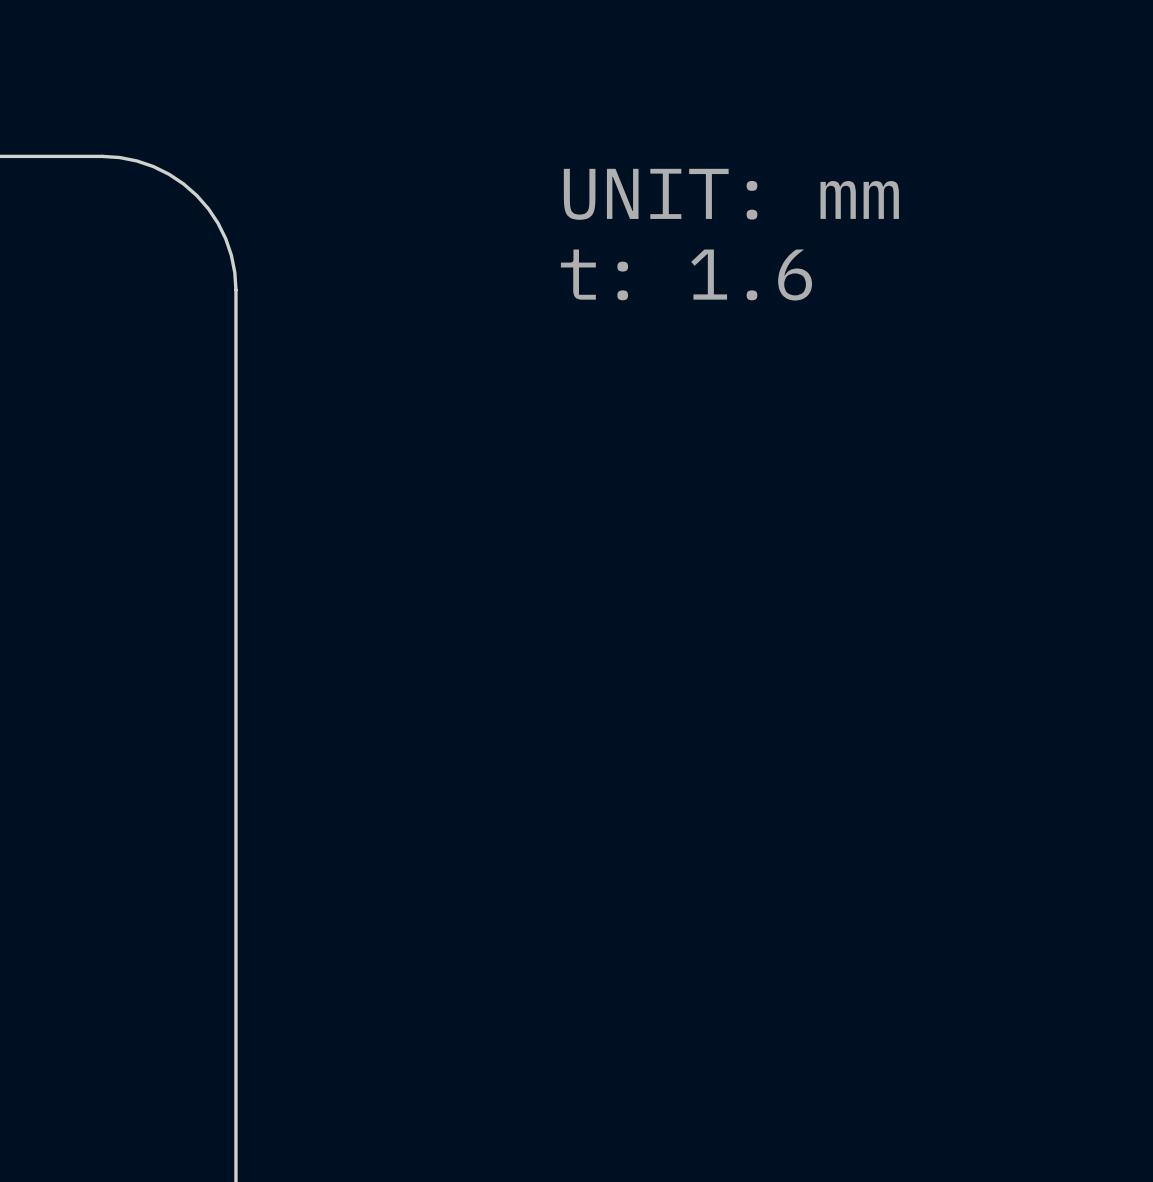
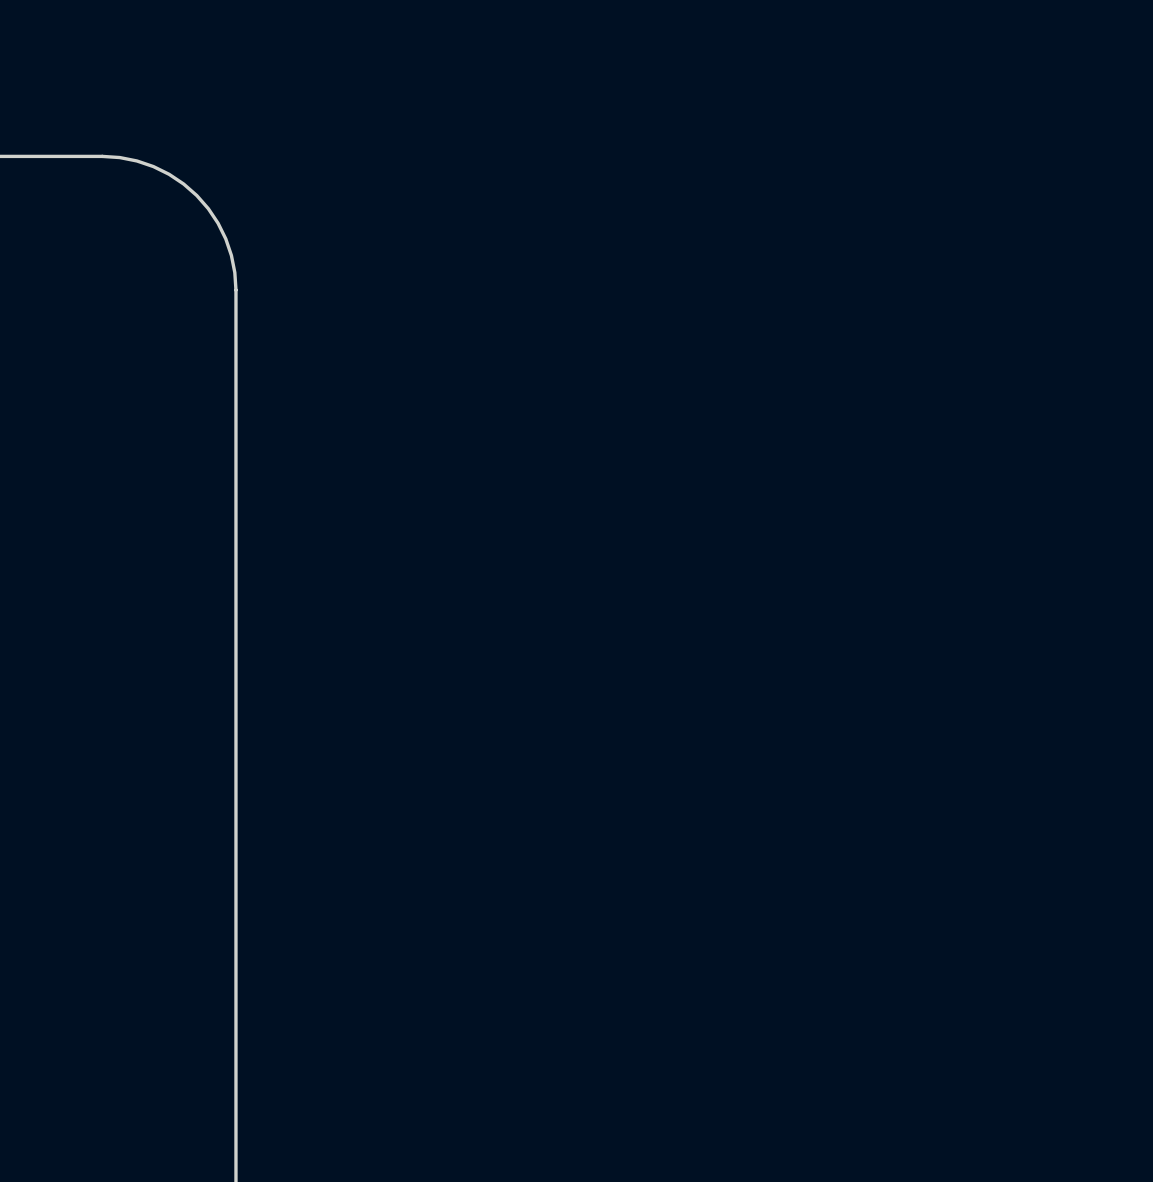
text: UNIT: mm (731, 194) -> none
text: t: 1.6 (686, 275) -> none

